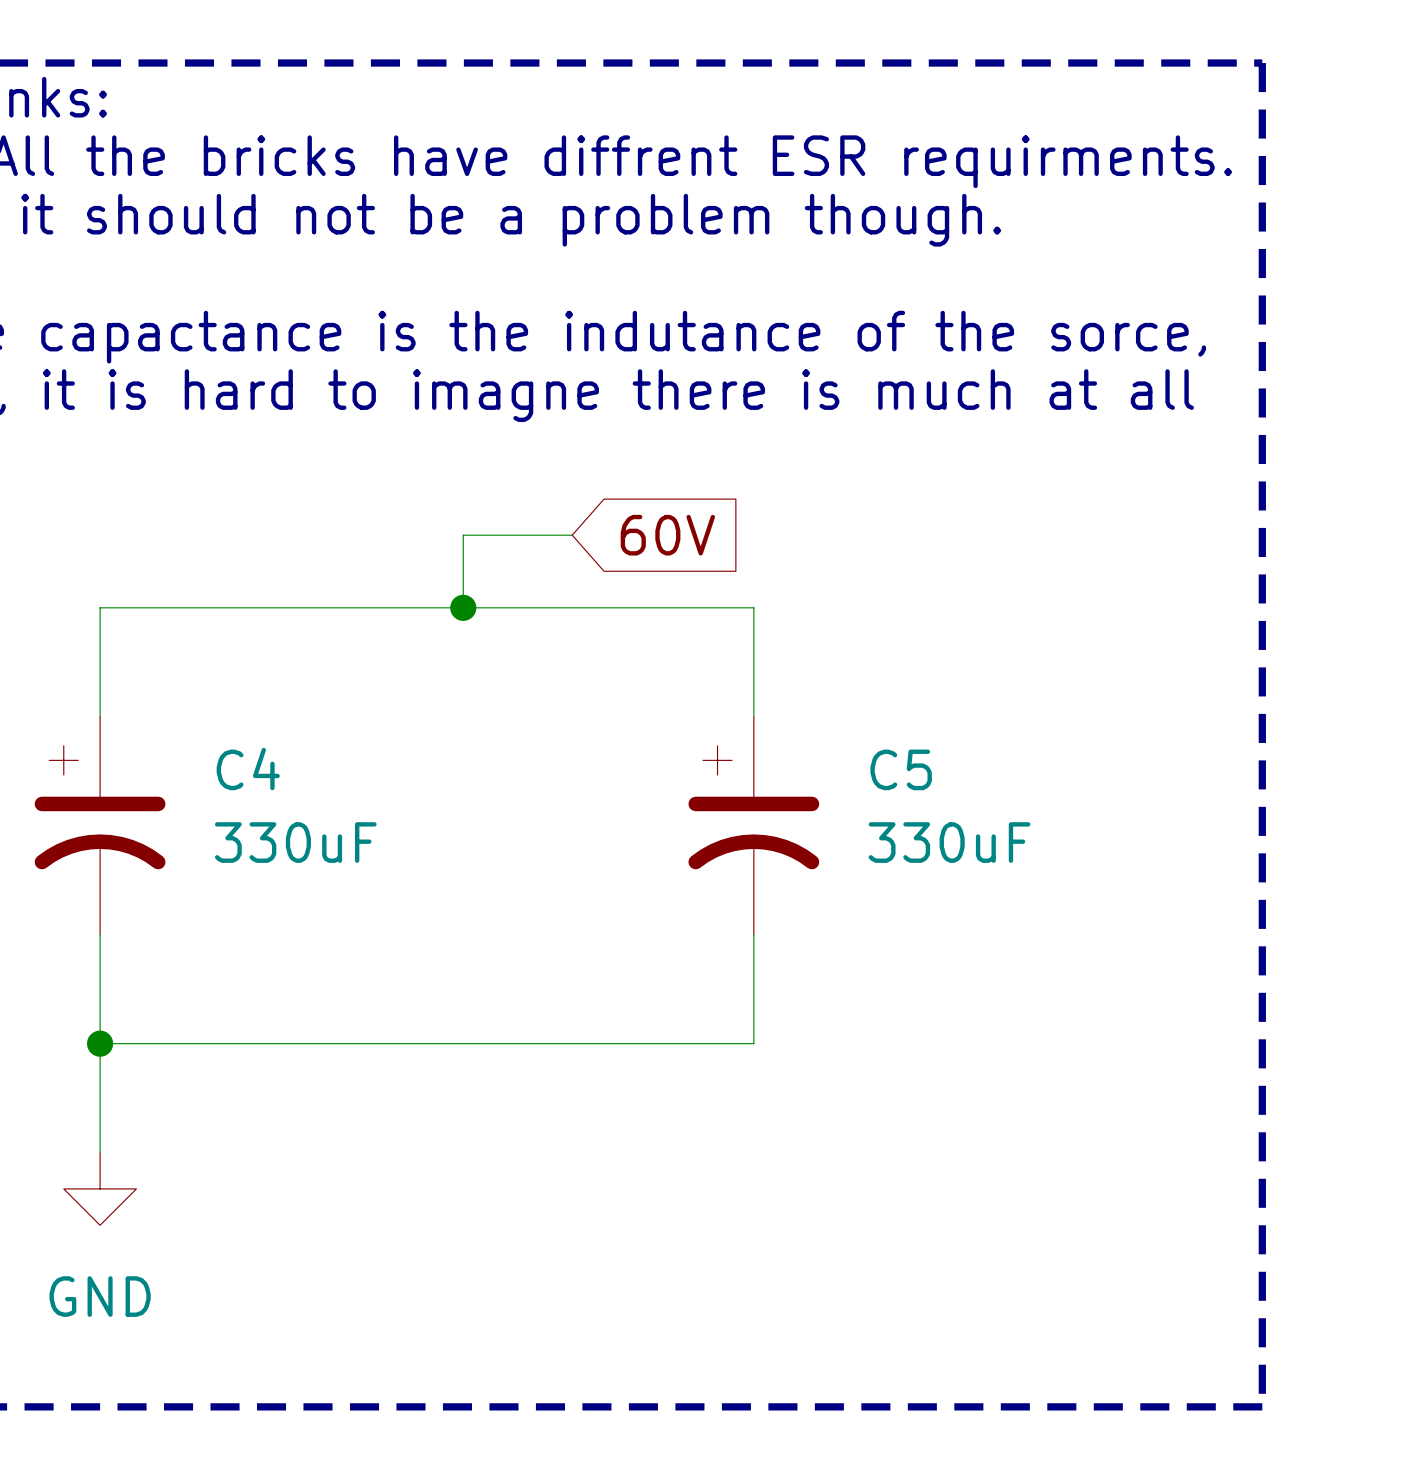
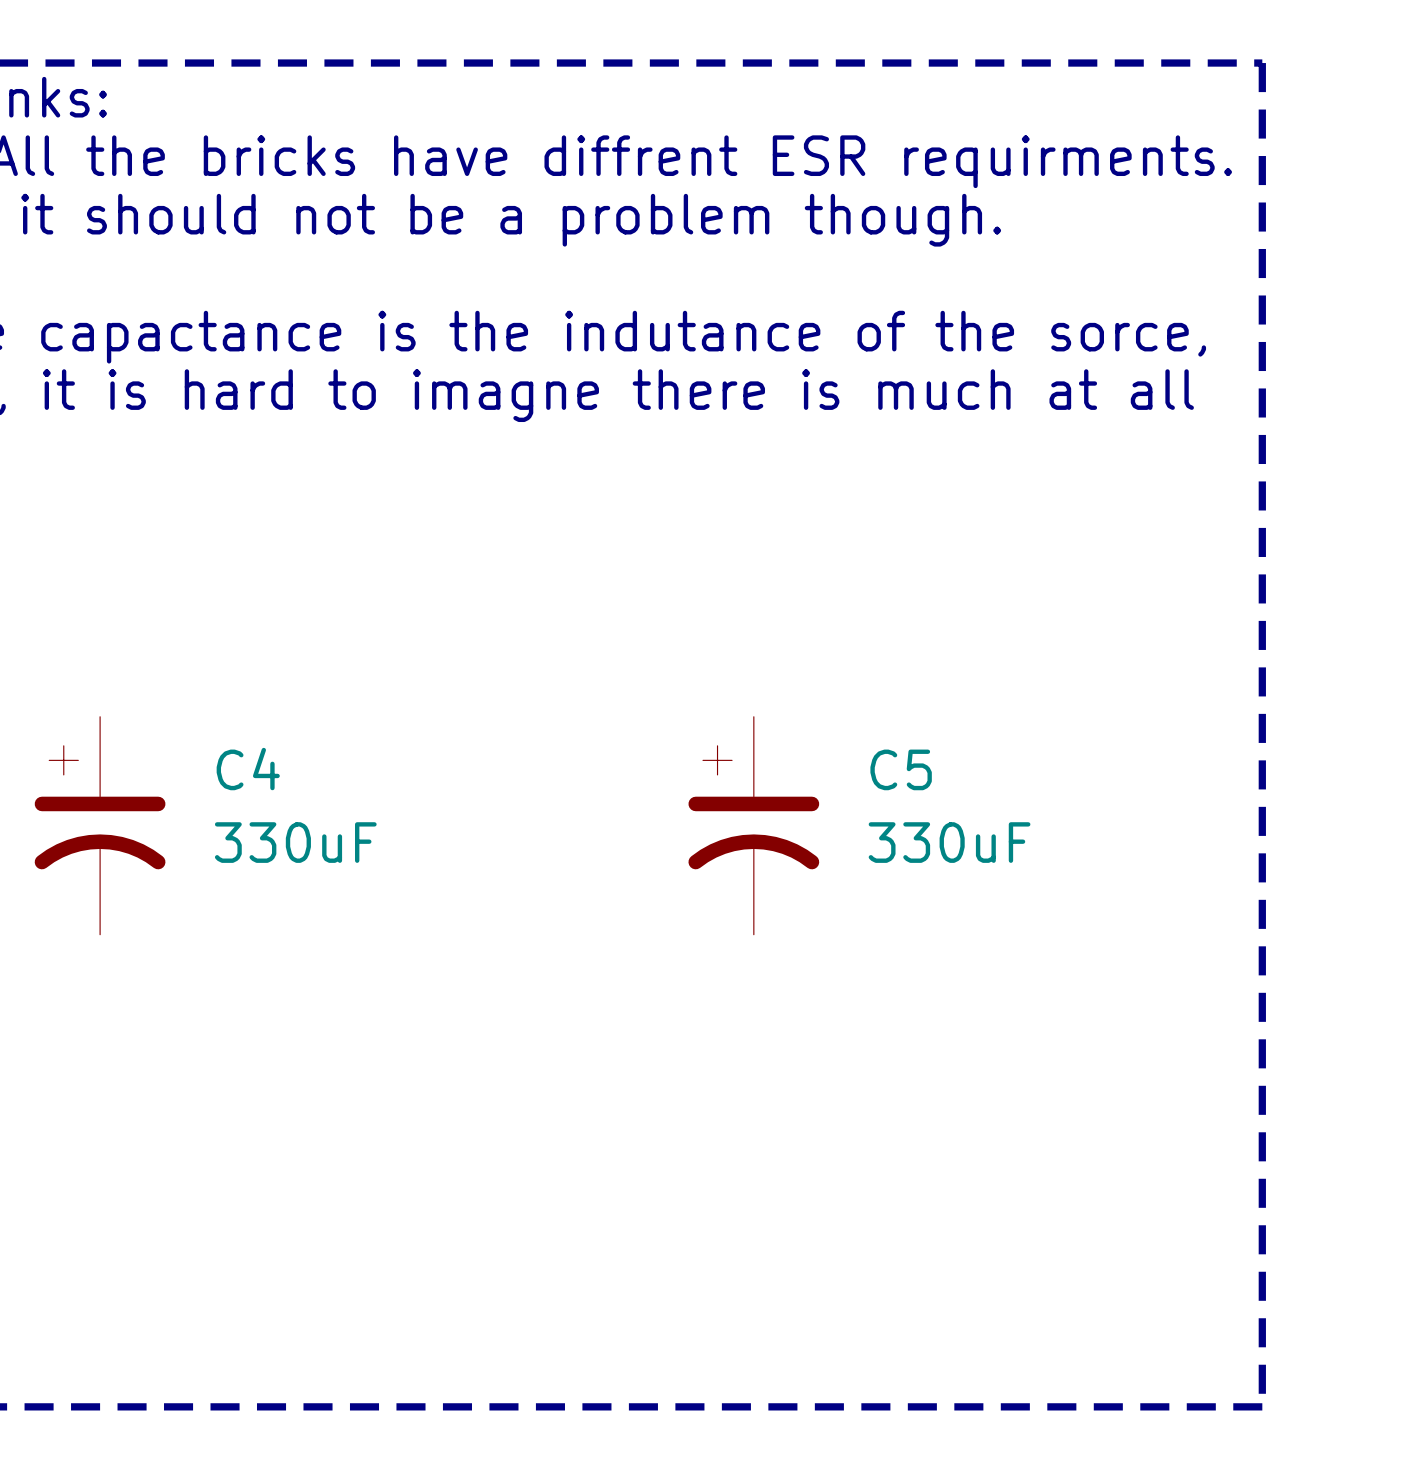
wire: (572, 535) (463, 535) (463, 607) -> none
global label: 60V (667, 535) -> none
junction: (463, 607) -> none
wire: (100, 716) (100, 607) (753, 607) (753, 716) -> none
wire: (100, 934) (100, 1152) -> none
wire: (753, 934) (753, 1043) (100, 1043) -> none
junction: (100, 1043) -> none
power symbol: GND (100, 1188) -> none

